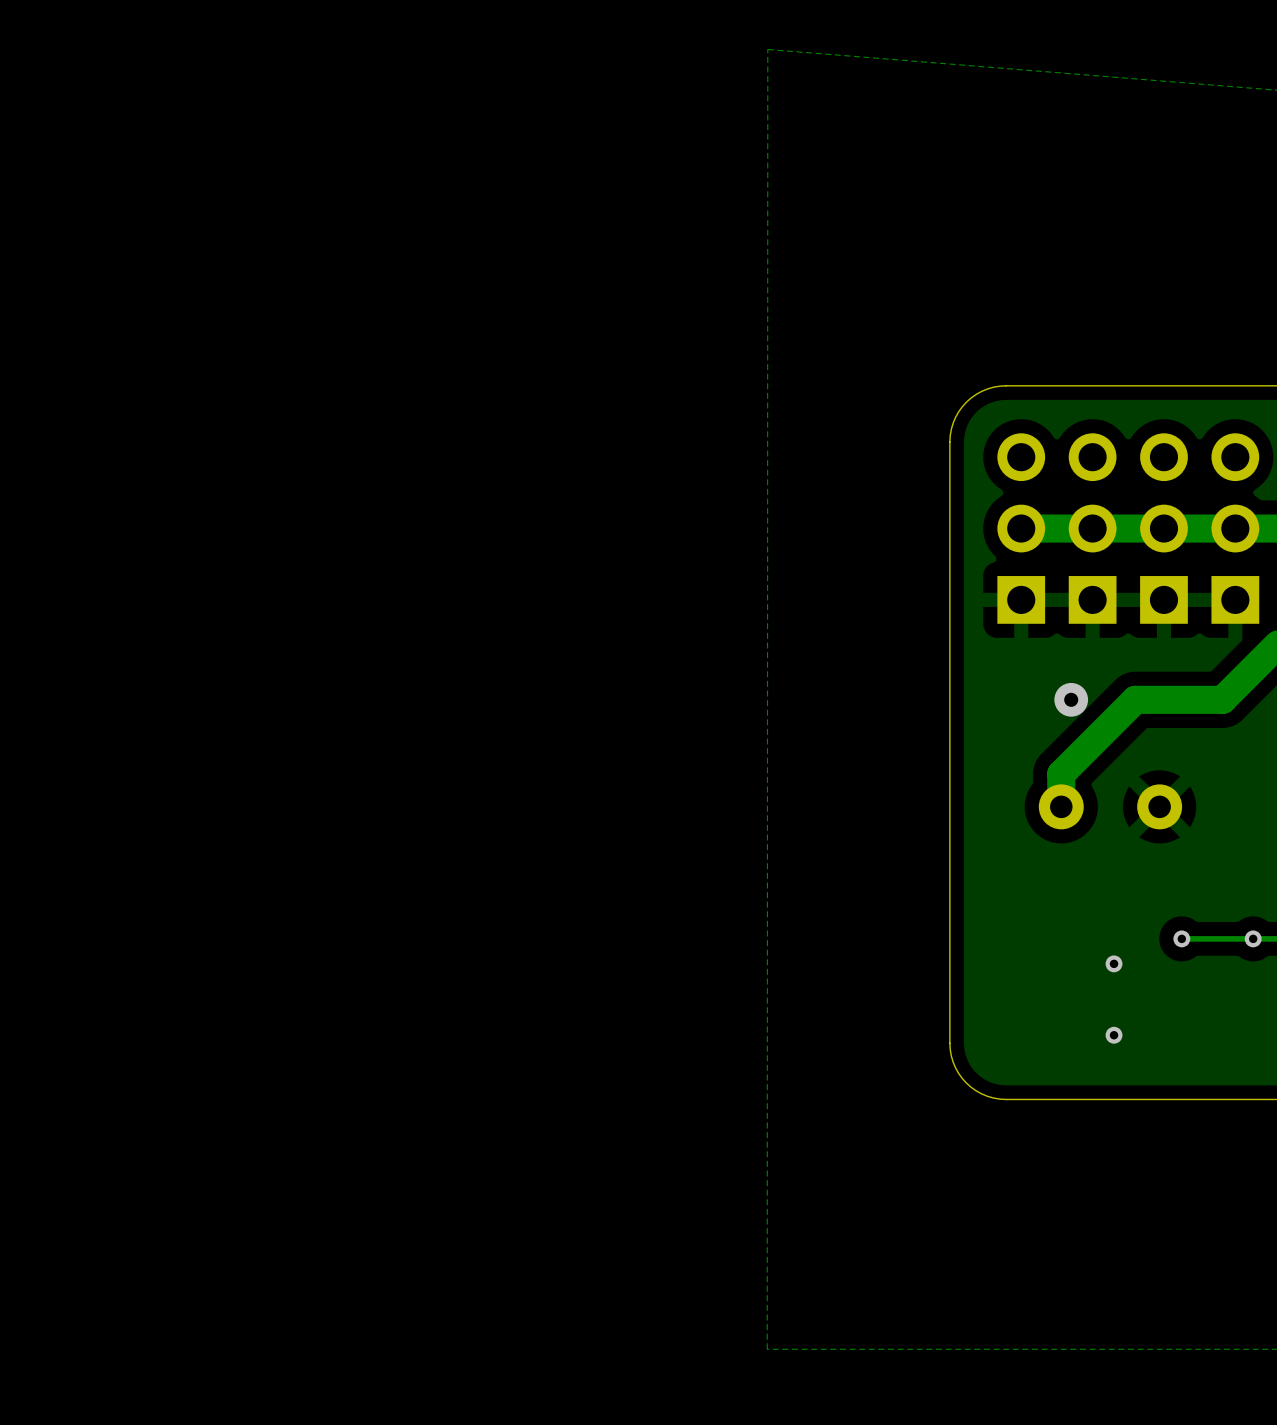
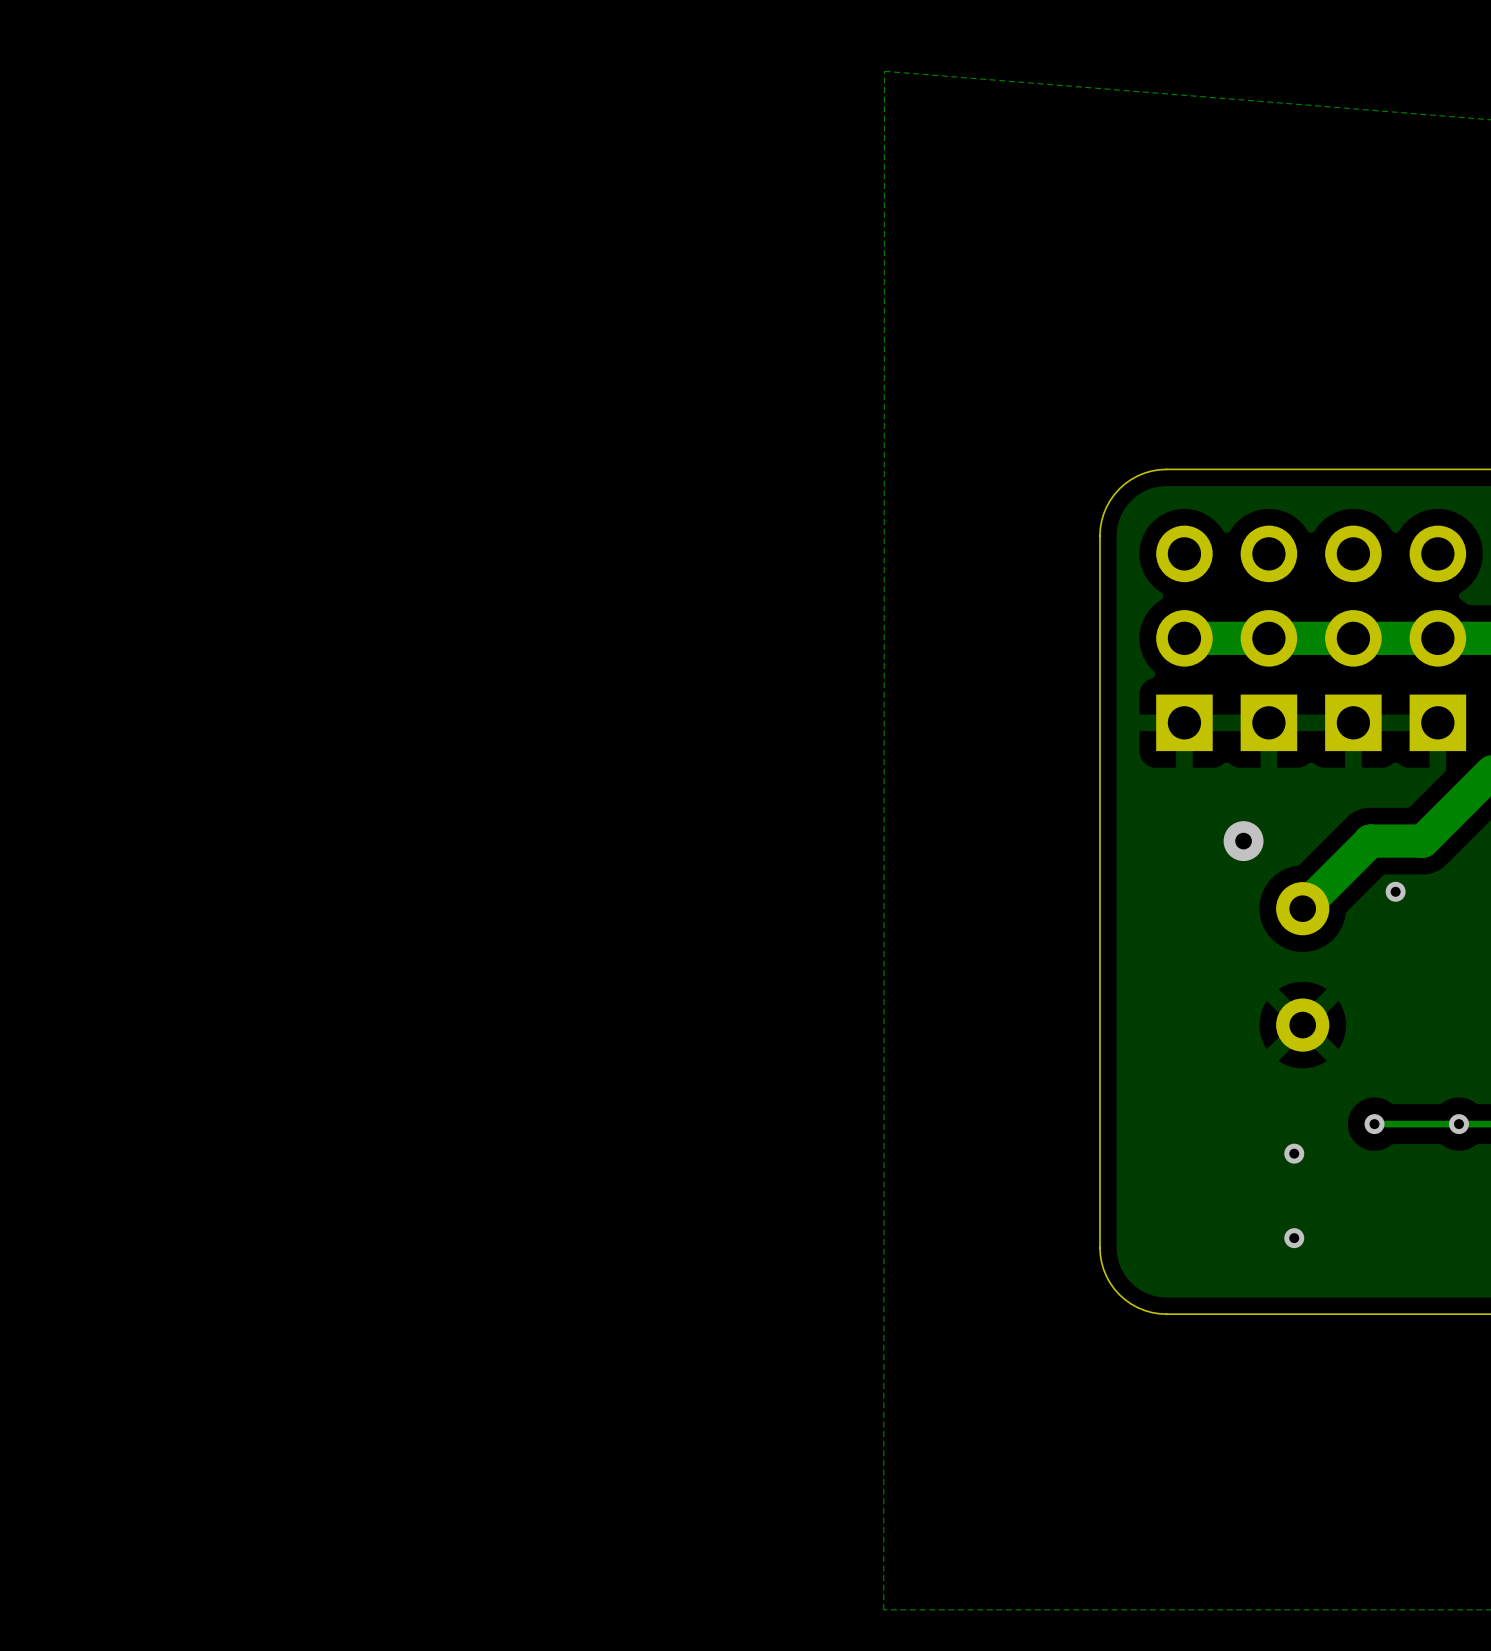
track: (1178, 699) (1135, 699) (1061, 773) (1061, 806) -> (1370, 841) (1302, 908)
via: none -> (1395, 891)
part rotation: 0° (1110, 806) -> 90° clockwise (1302, 966)

